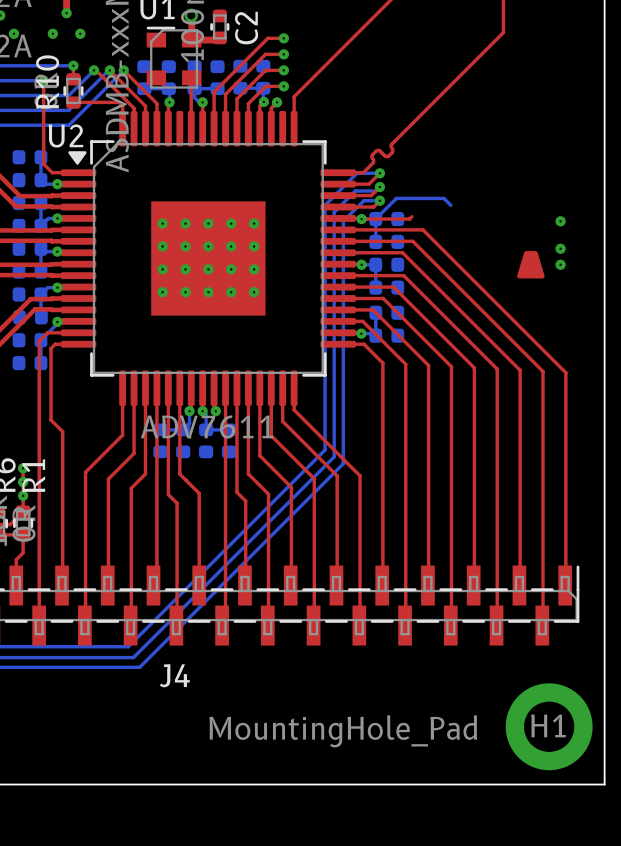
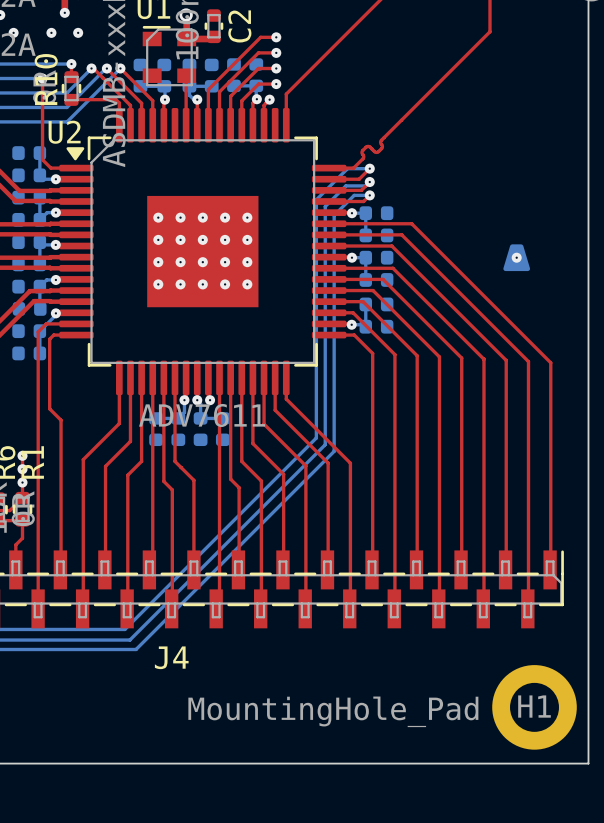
bottom track: (450, 205) (443, 198) (396, 198) (375, 219) -> none
top track: (411, 216) (409, 219) (361, 219) -> none
via: (560, 221) -> none
via: (560, 248) -> none
drawing shape: [517, 251, 545, 279] -> [503, 244, 531, 272]
via: none -> (516, 257)
via: (560, 264) -> none

